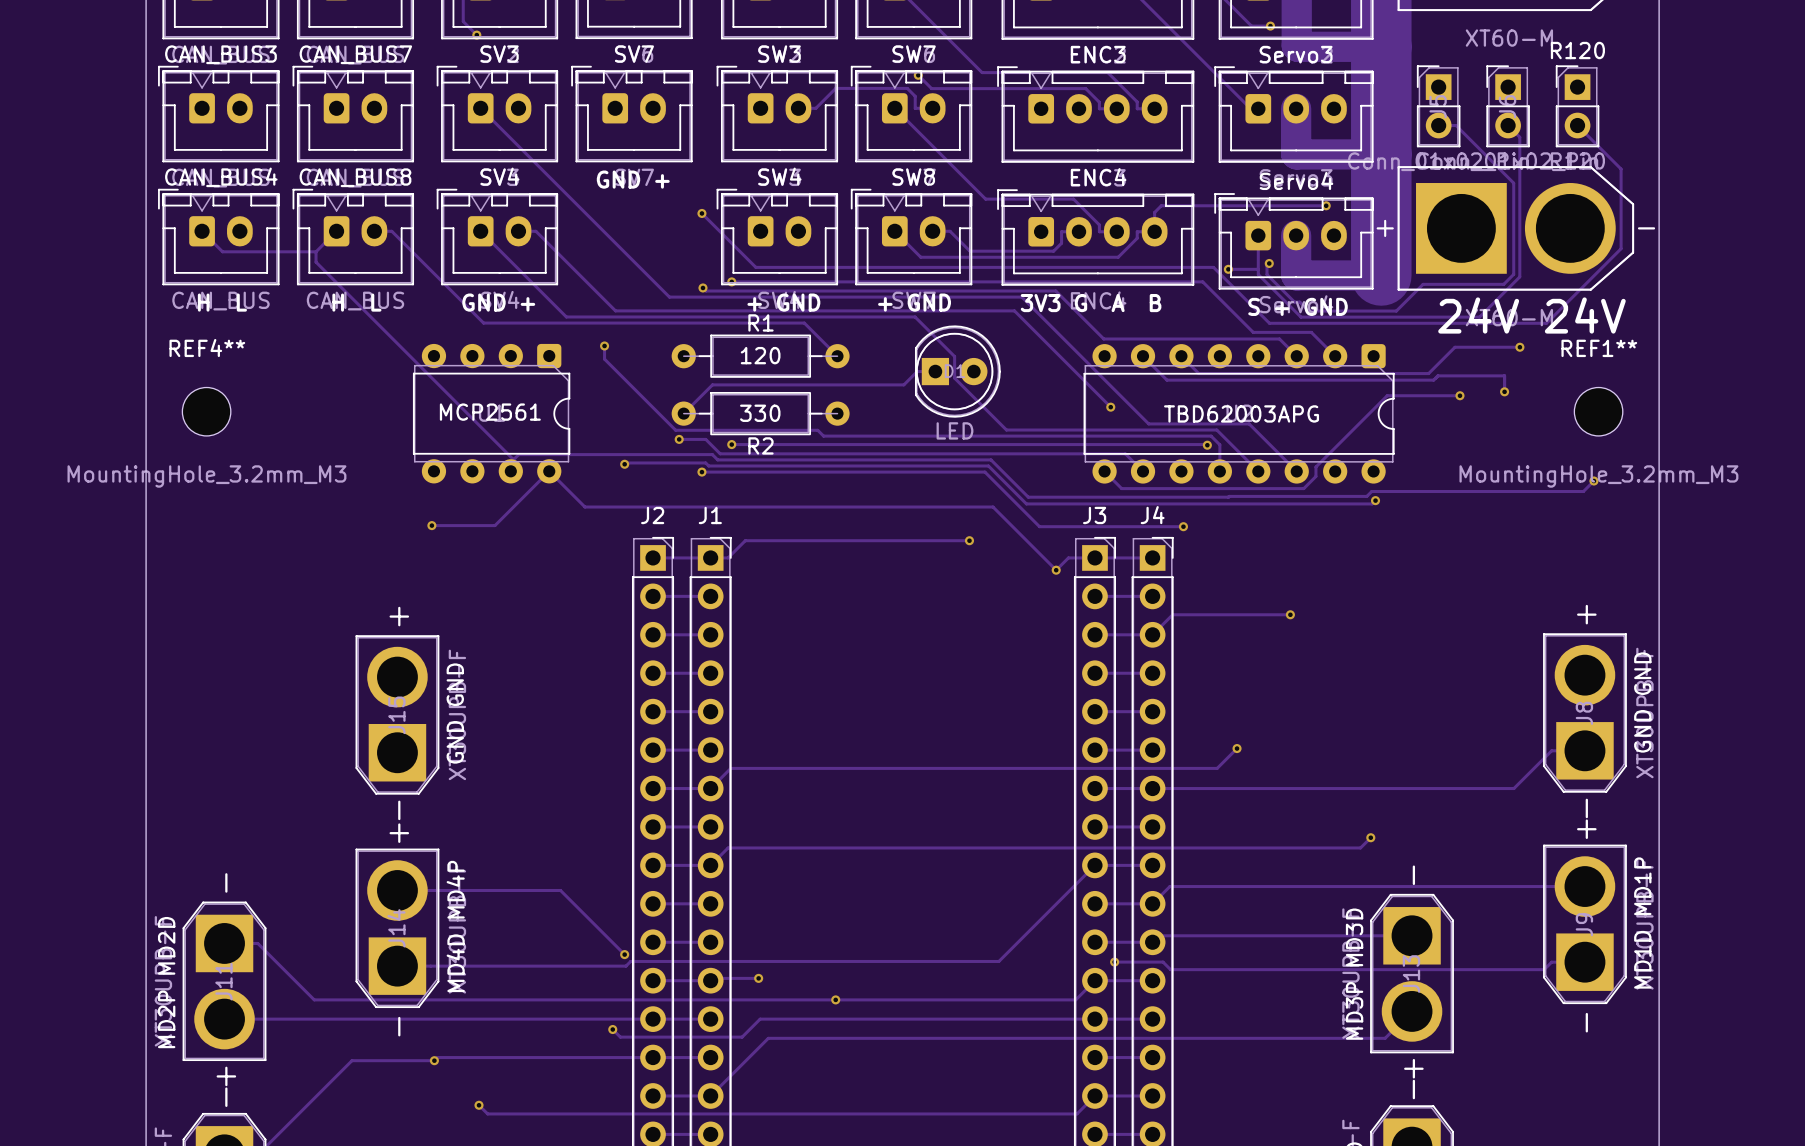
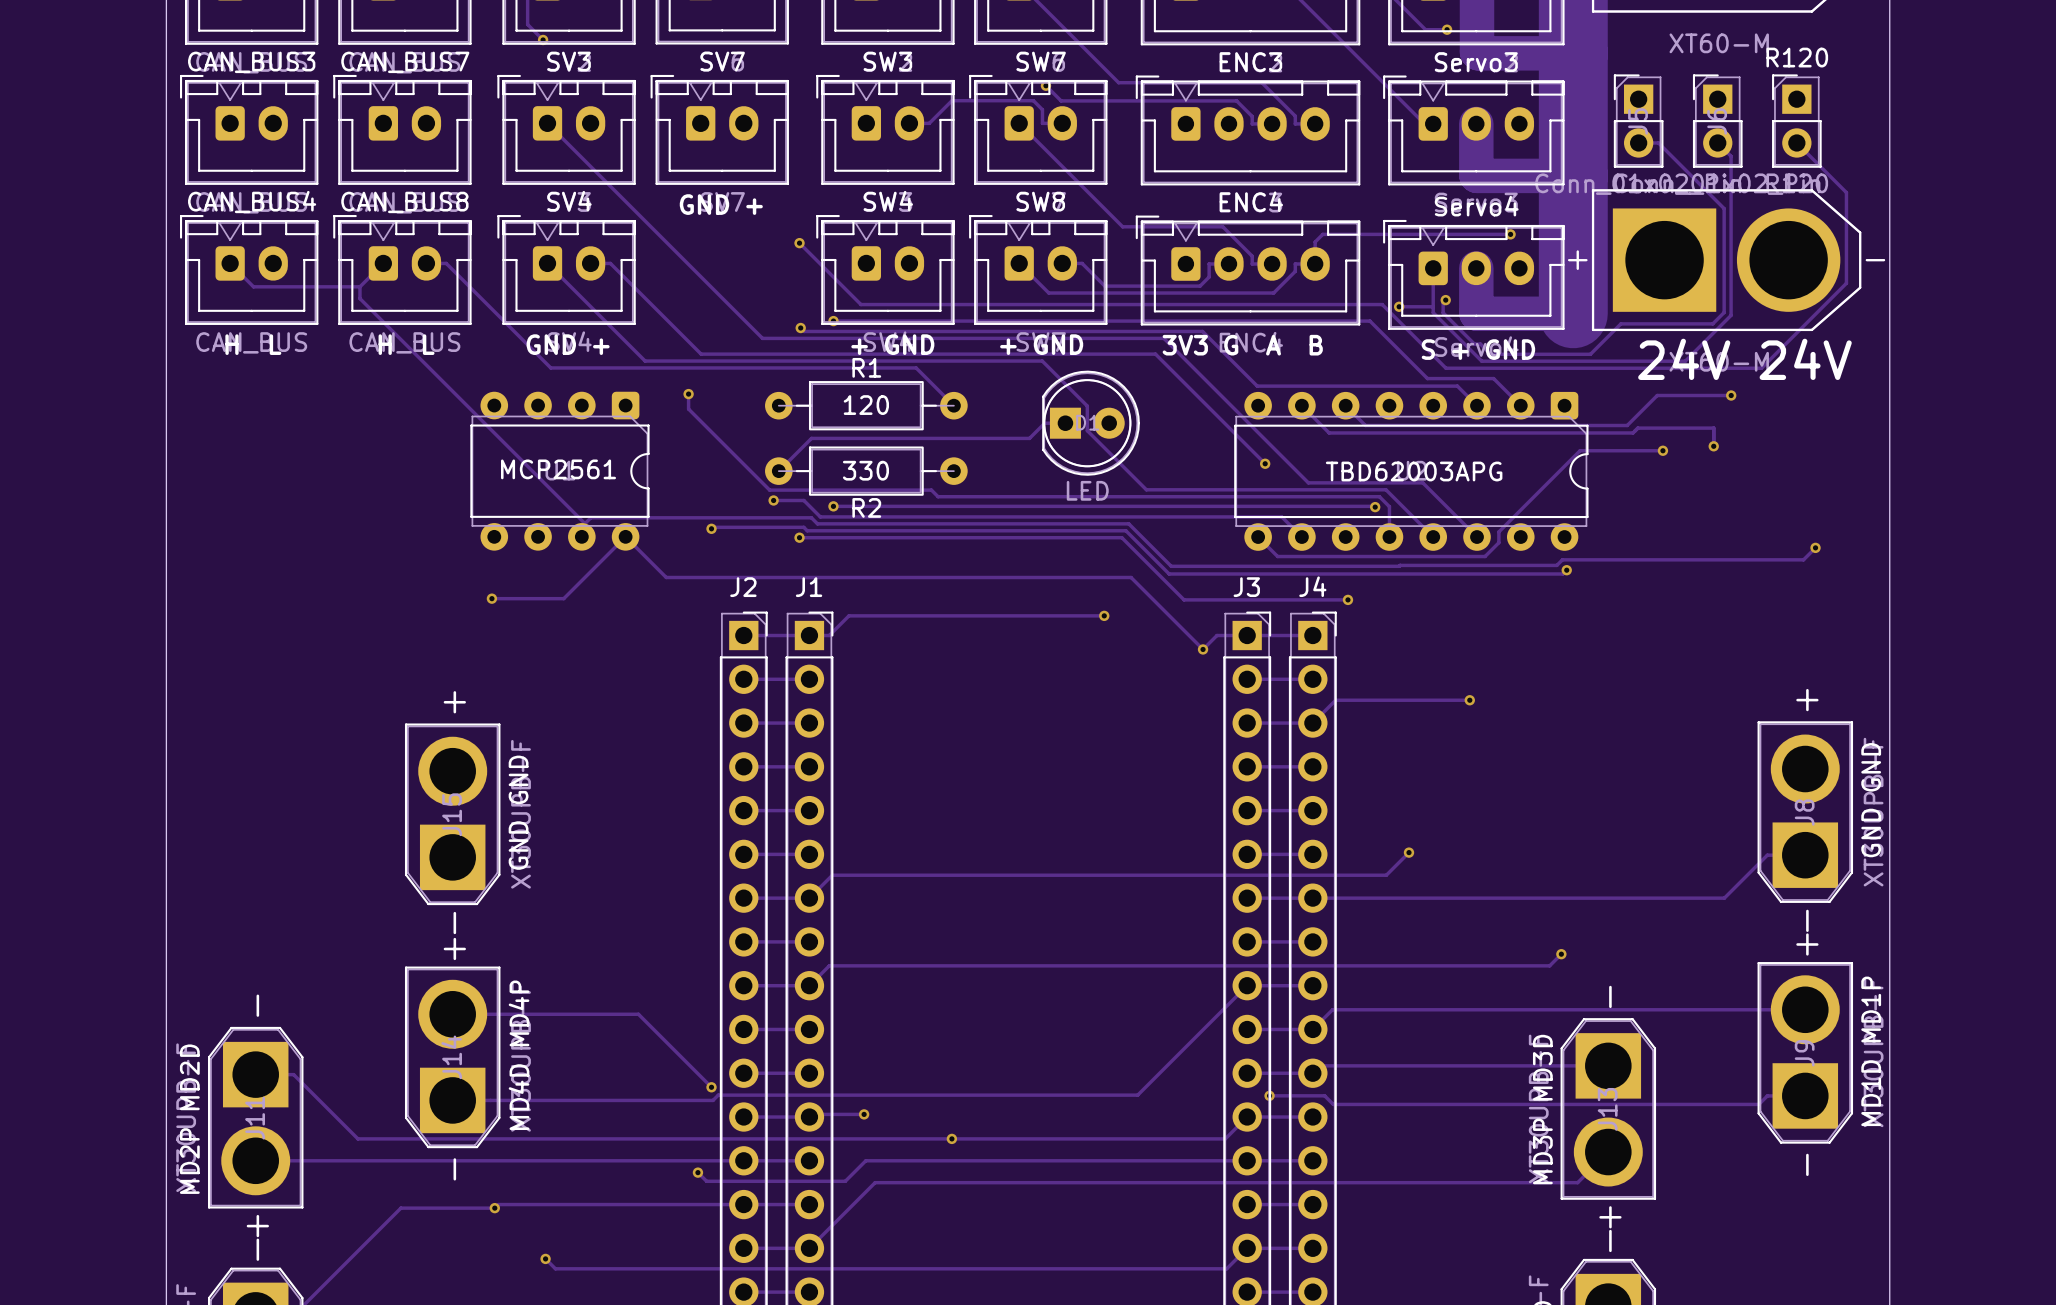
REF4**: MountingHole_3.2mm_M3 (206, 411) -> none
REF1**: MountingHole_3.2mm_M3 (1598, 411) -> none

